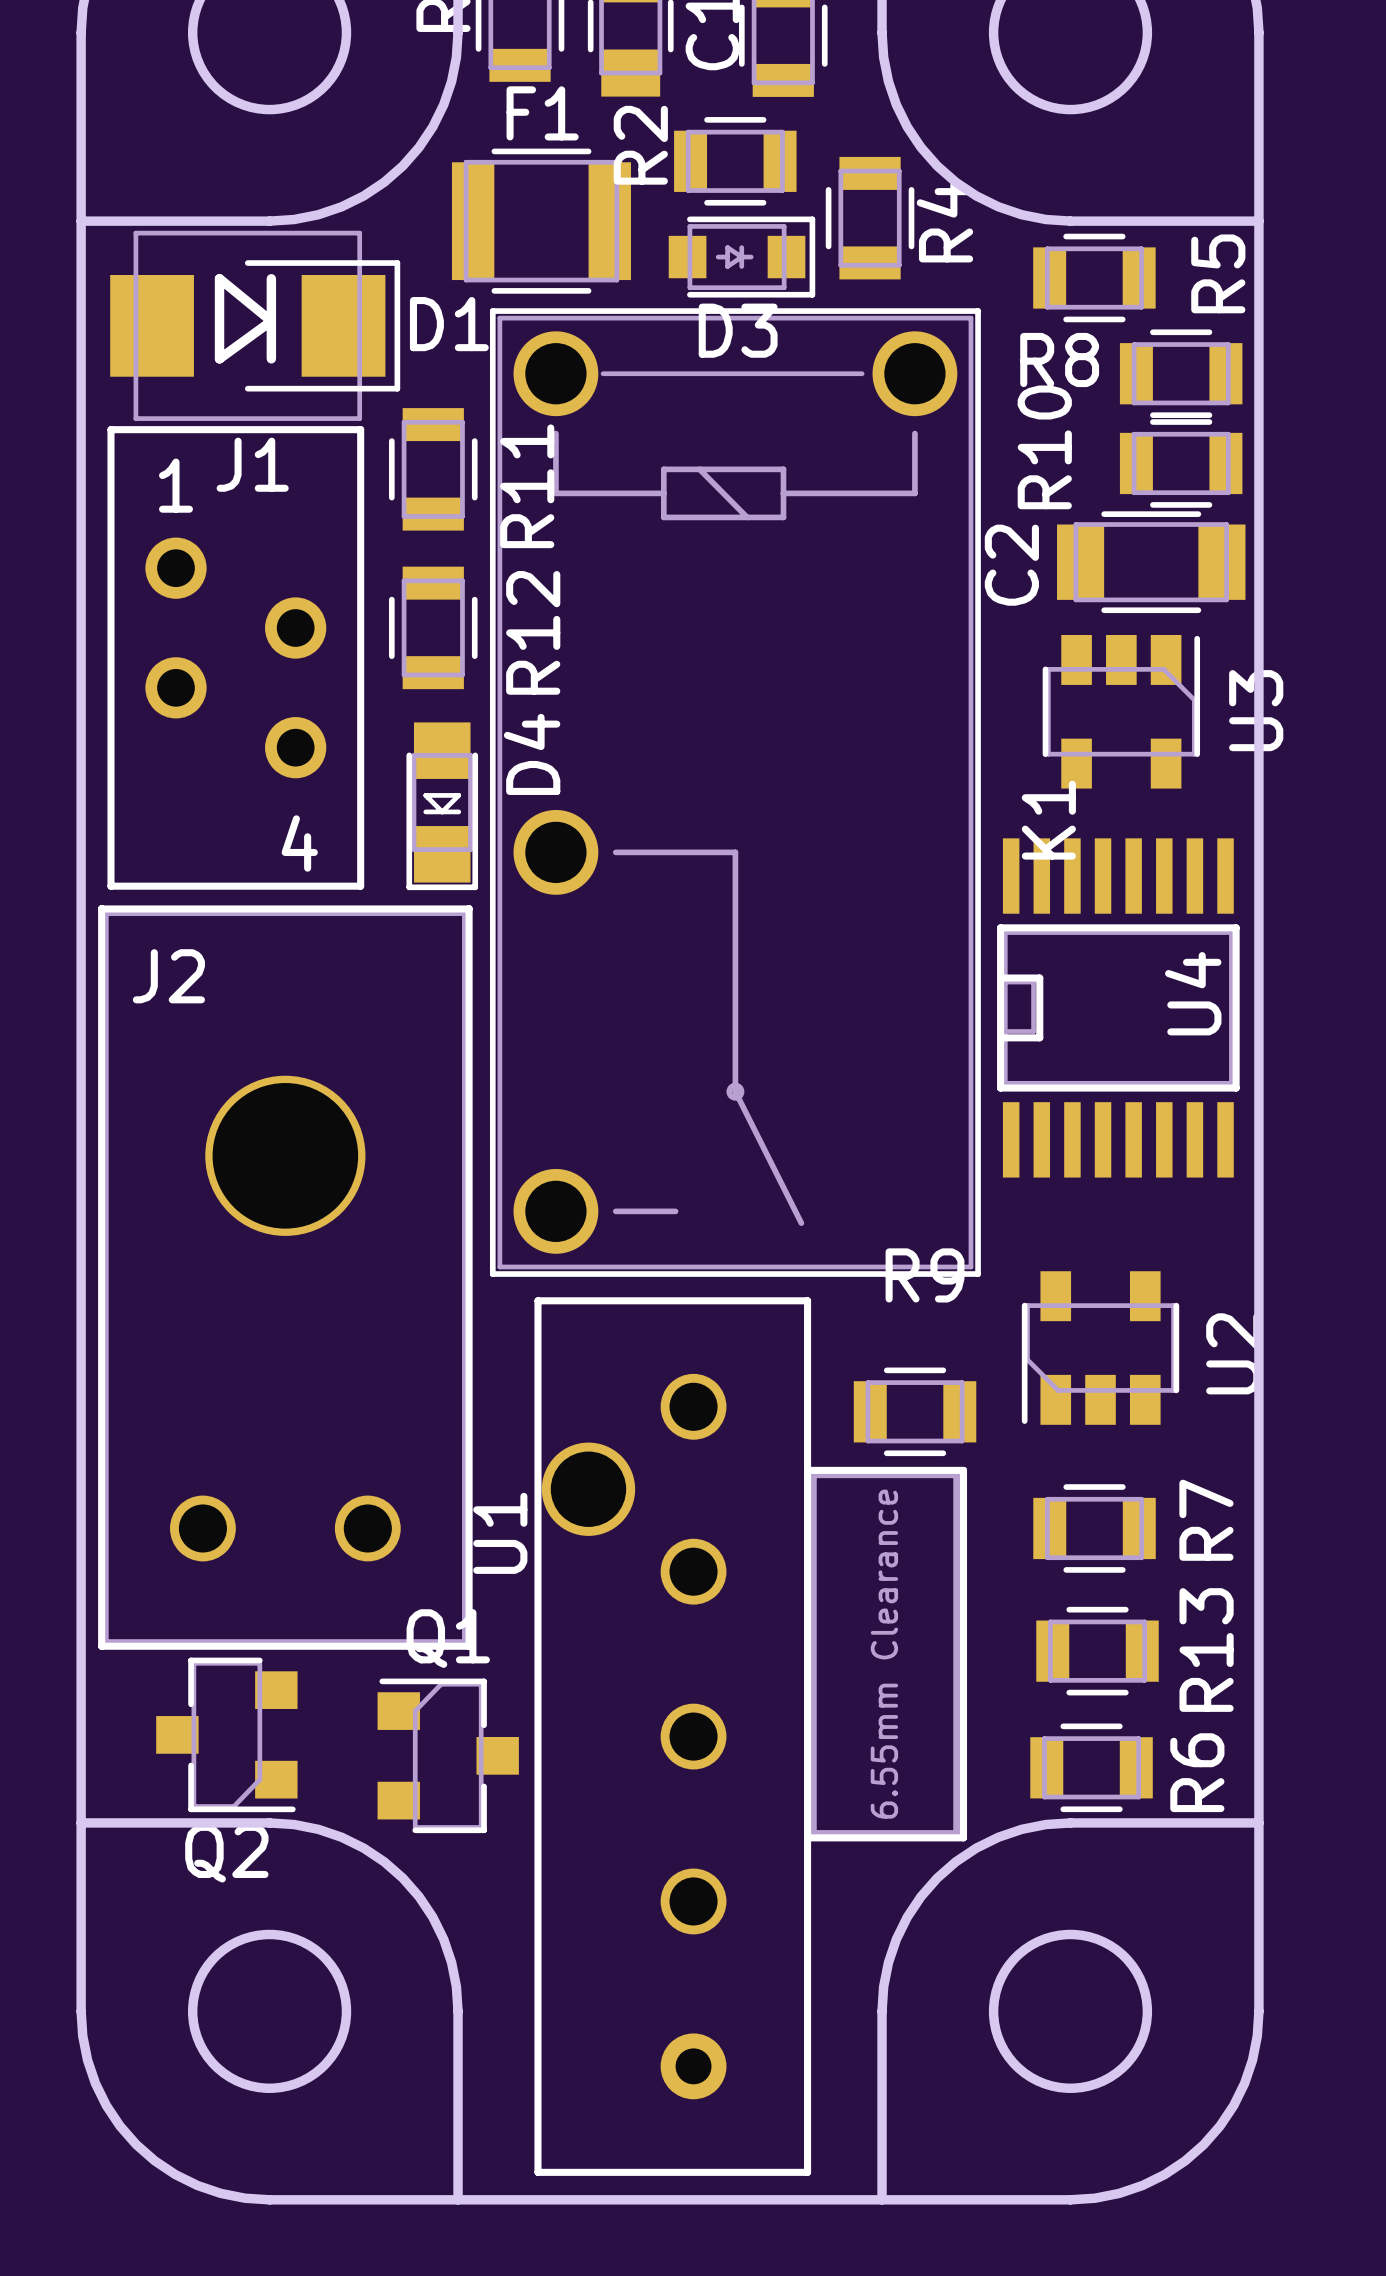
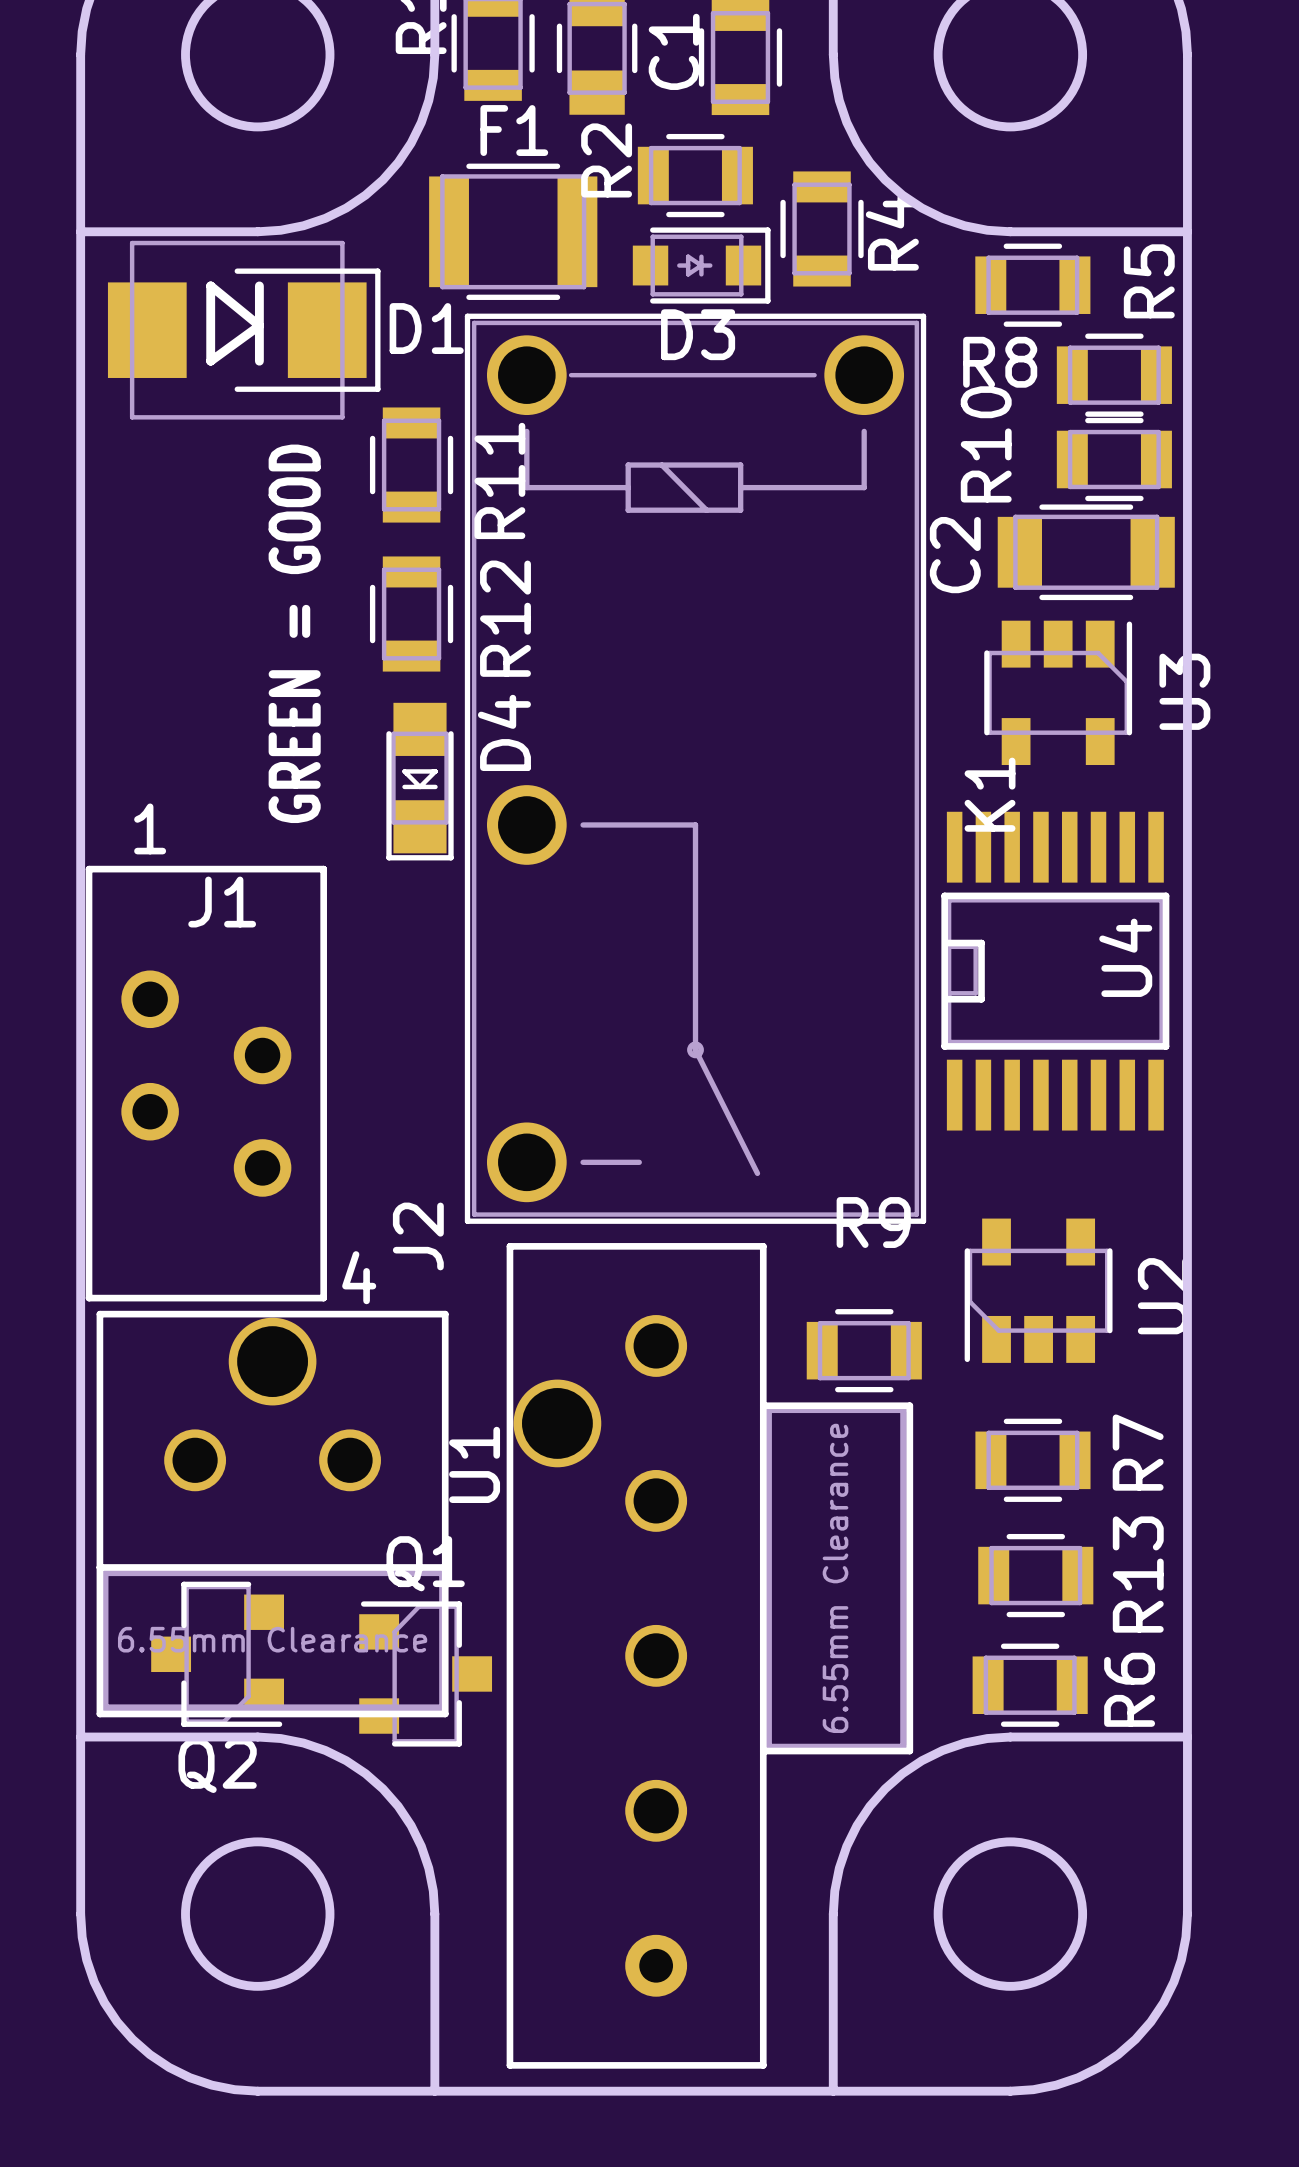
J1 text position: 1 (176, 485) -> 1 (150, 828)
text: none -> GREEN = GOOD (294, 633)
J1 position: (235, 657) -> (206, 1083)
J1 text position: 4 (299, 843) -> 4 (359, 1277)
J2 footprint: [98, 904, 473, 1650] -> [96, 1310, 449, 1718]
J2 name position: J2 (168, 976) -> J2 (418, 1236)

